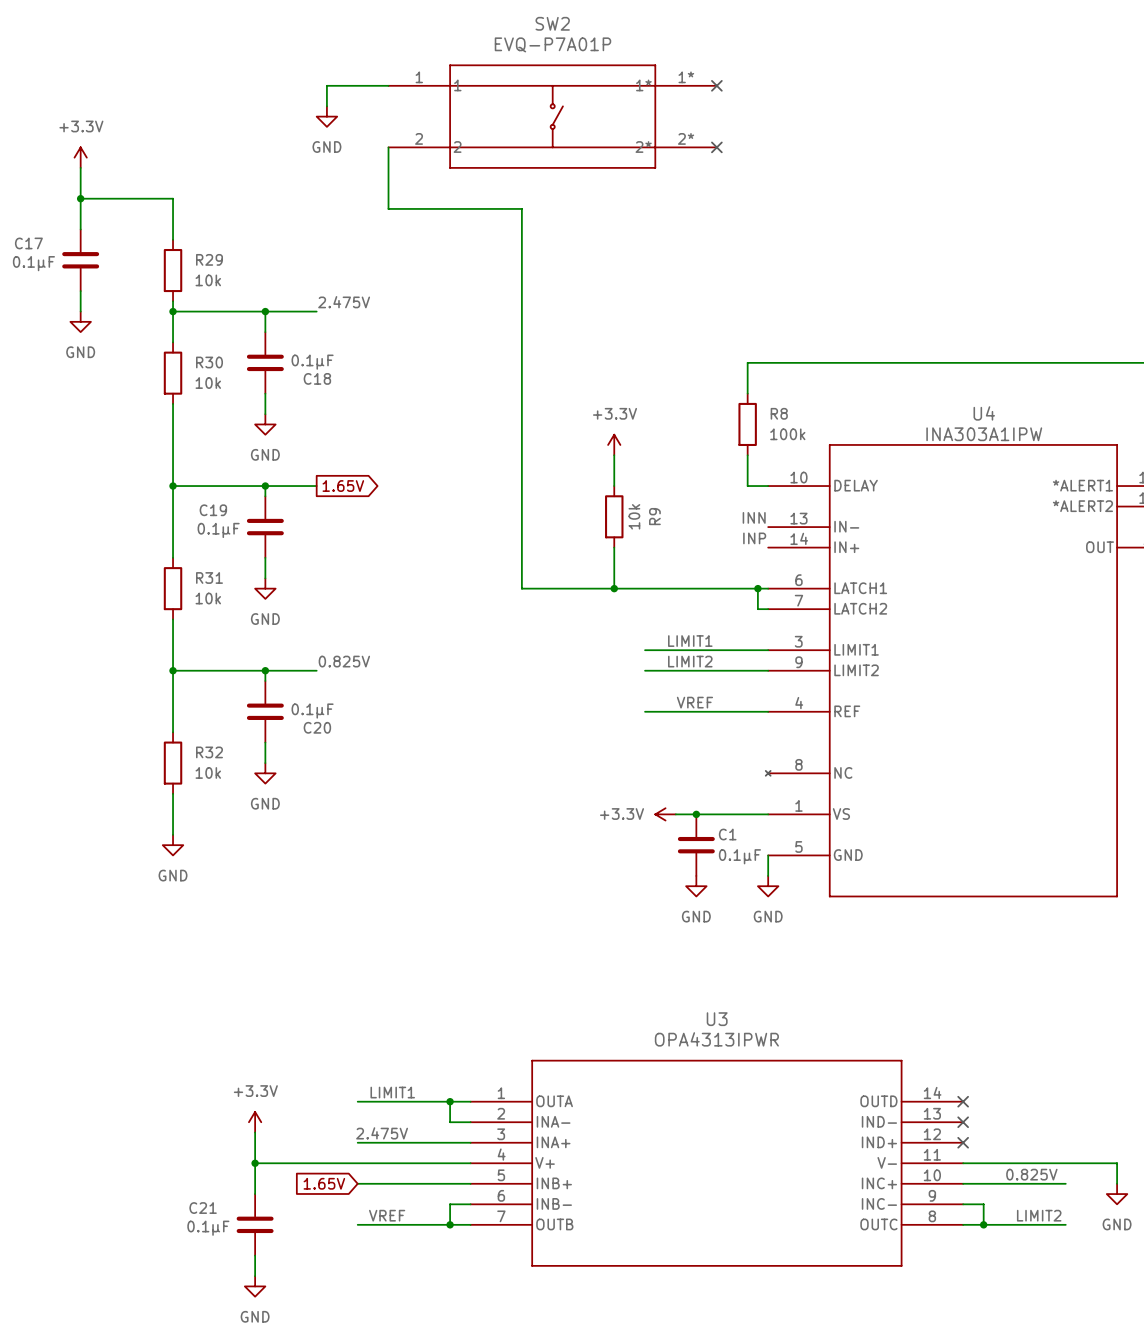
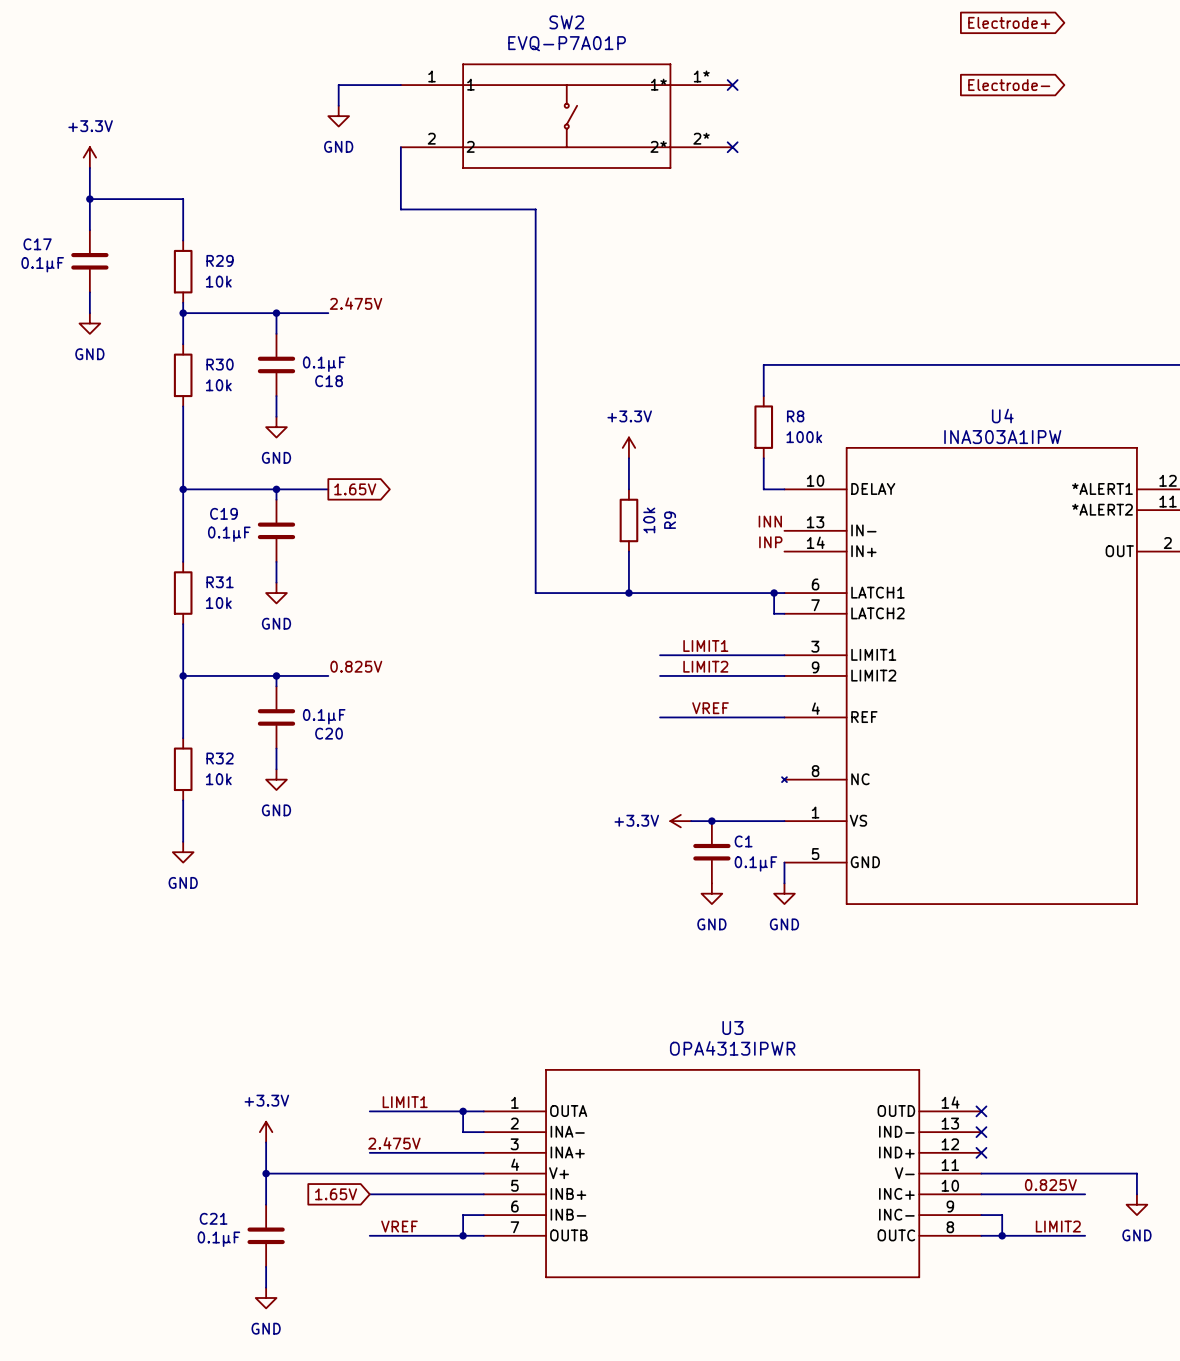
global label: none -> Electrode+ (1009, 22)
global label: none -> Electrode- (1009, 85)

